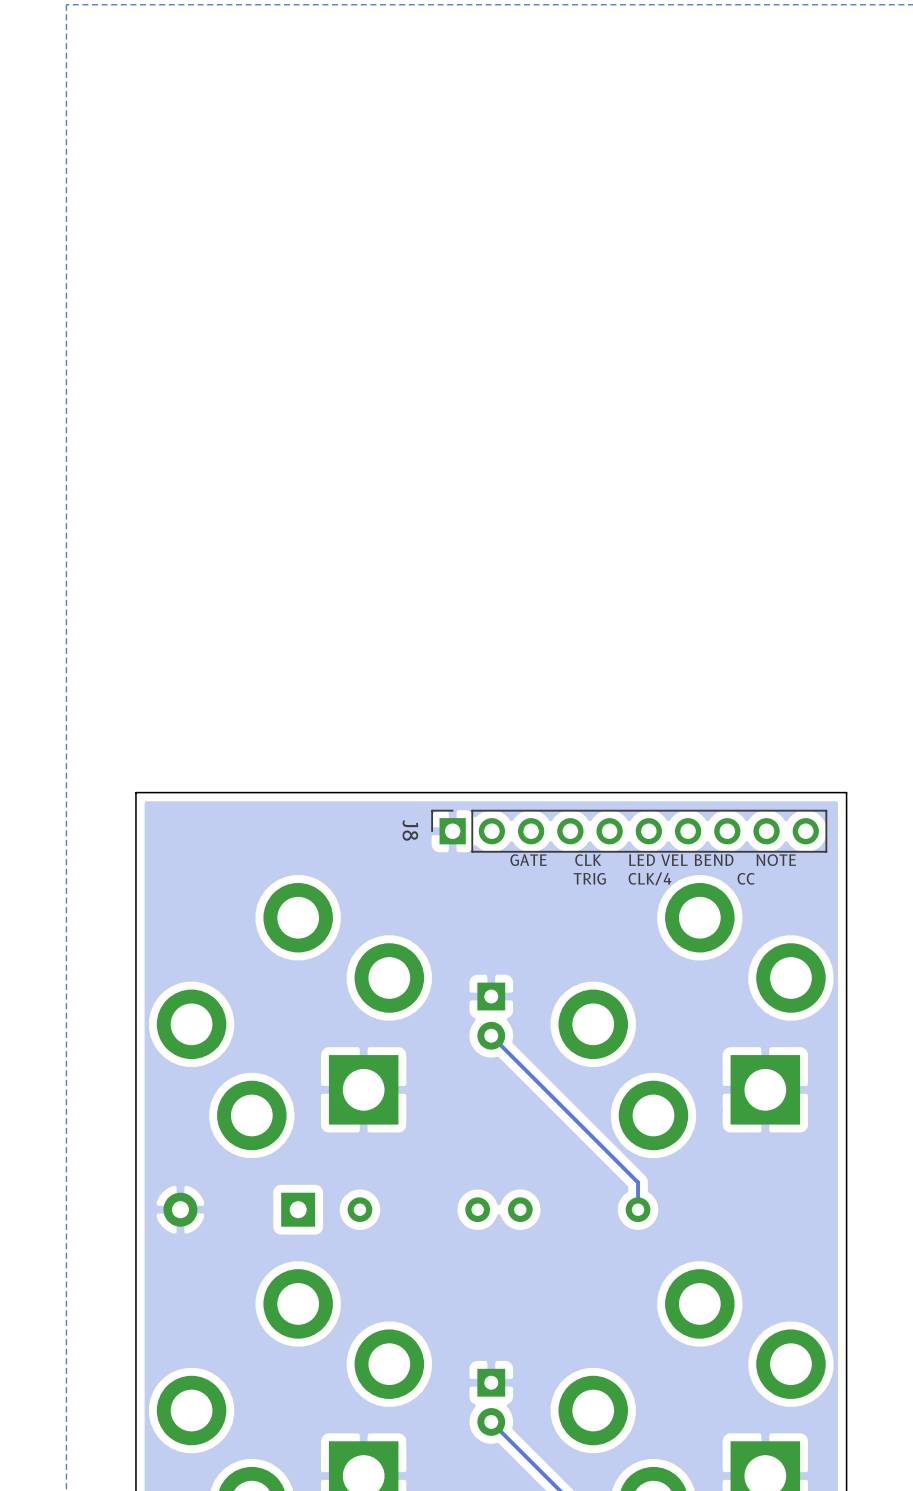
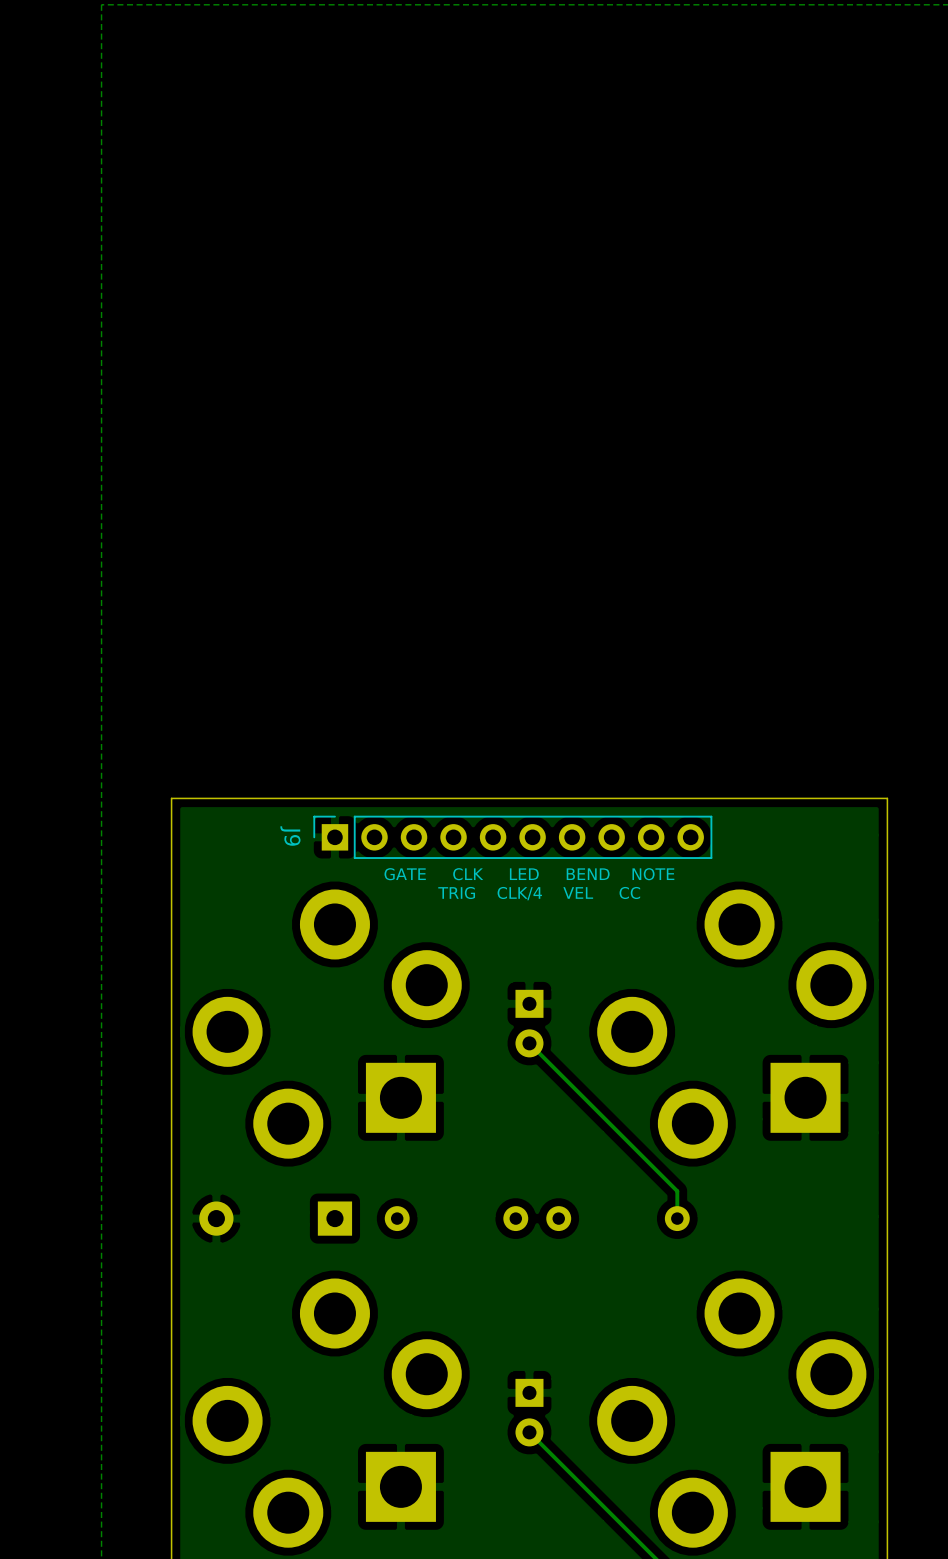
J9: none -> (512, 837)
J8: (629, 831) -> none
text: GATE CLK LED VEL BEND NOTE (653, 860) -> GATE CLK LED BEND NOTE (529, 874)
text: TRIG CLK/4 CC (664, 878) -> TRIG CLK/4 VEL CC (539, 893)

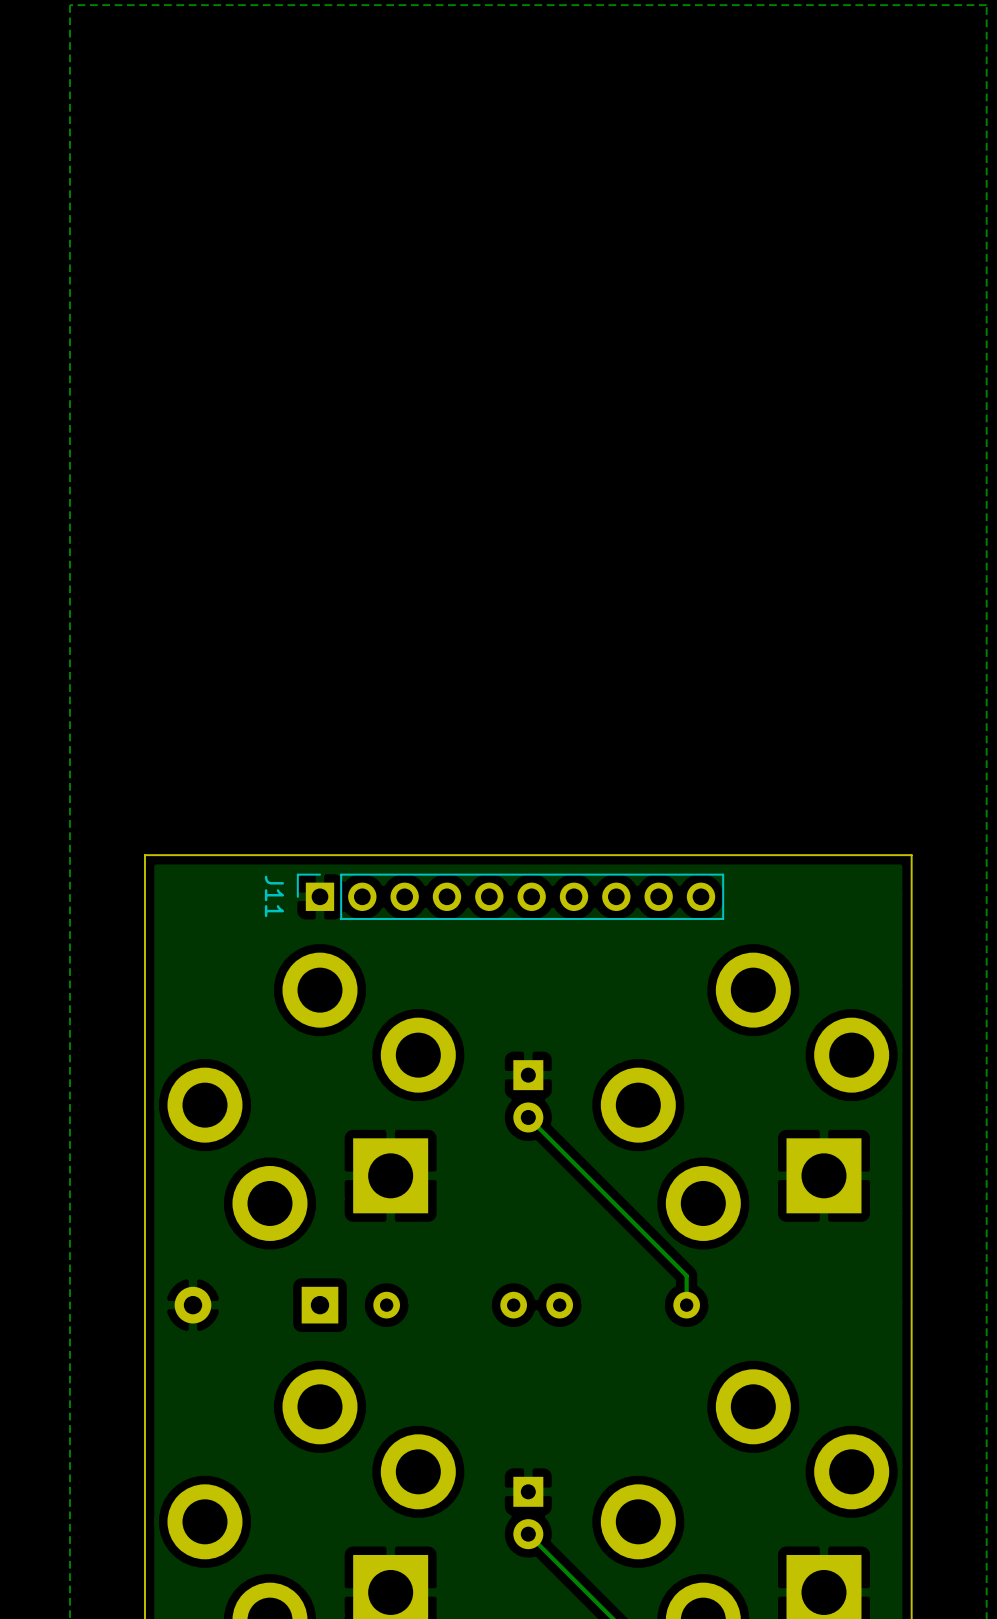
J9 name: J9 (290, 836) -> J11 (274, 896)
text: GATE CLK LED BEND NOTE (529, 874) -> none
text: TRIG CLK/4 VEL CC (539, 893) -> none

